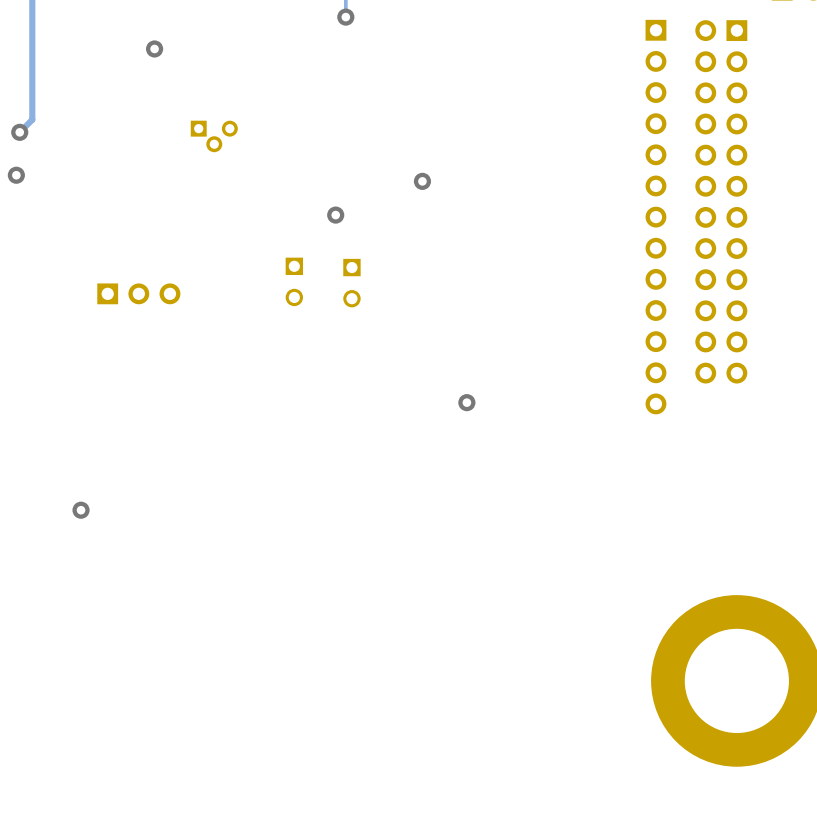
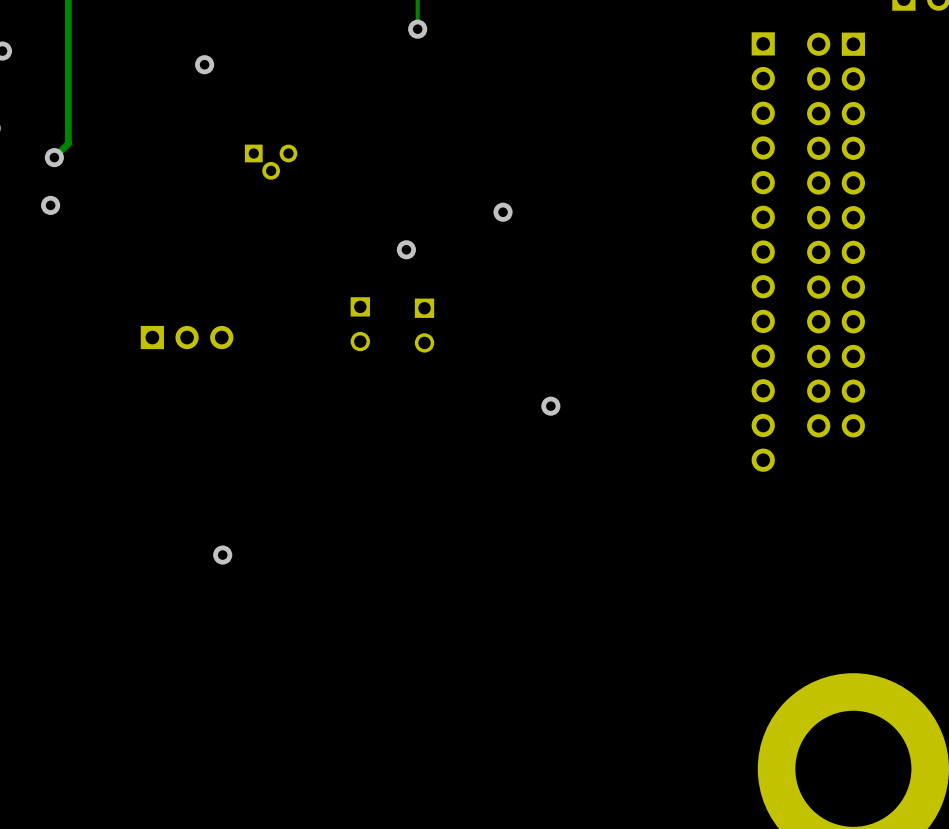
via position: (466, 402) -> (550, 406)
via: none -> (222, 555)
via: (81, 510) -> none

